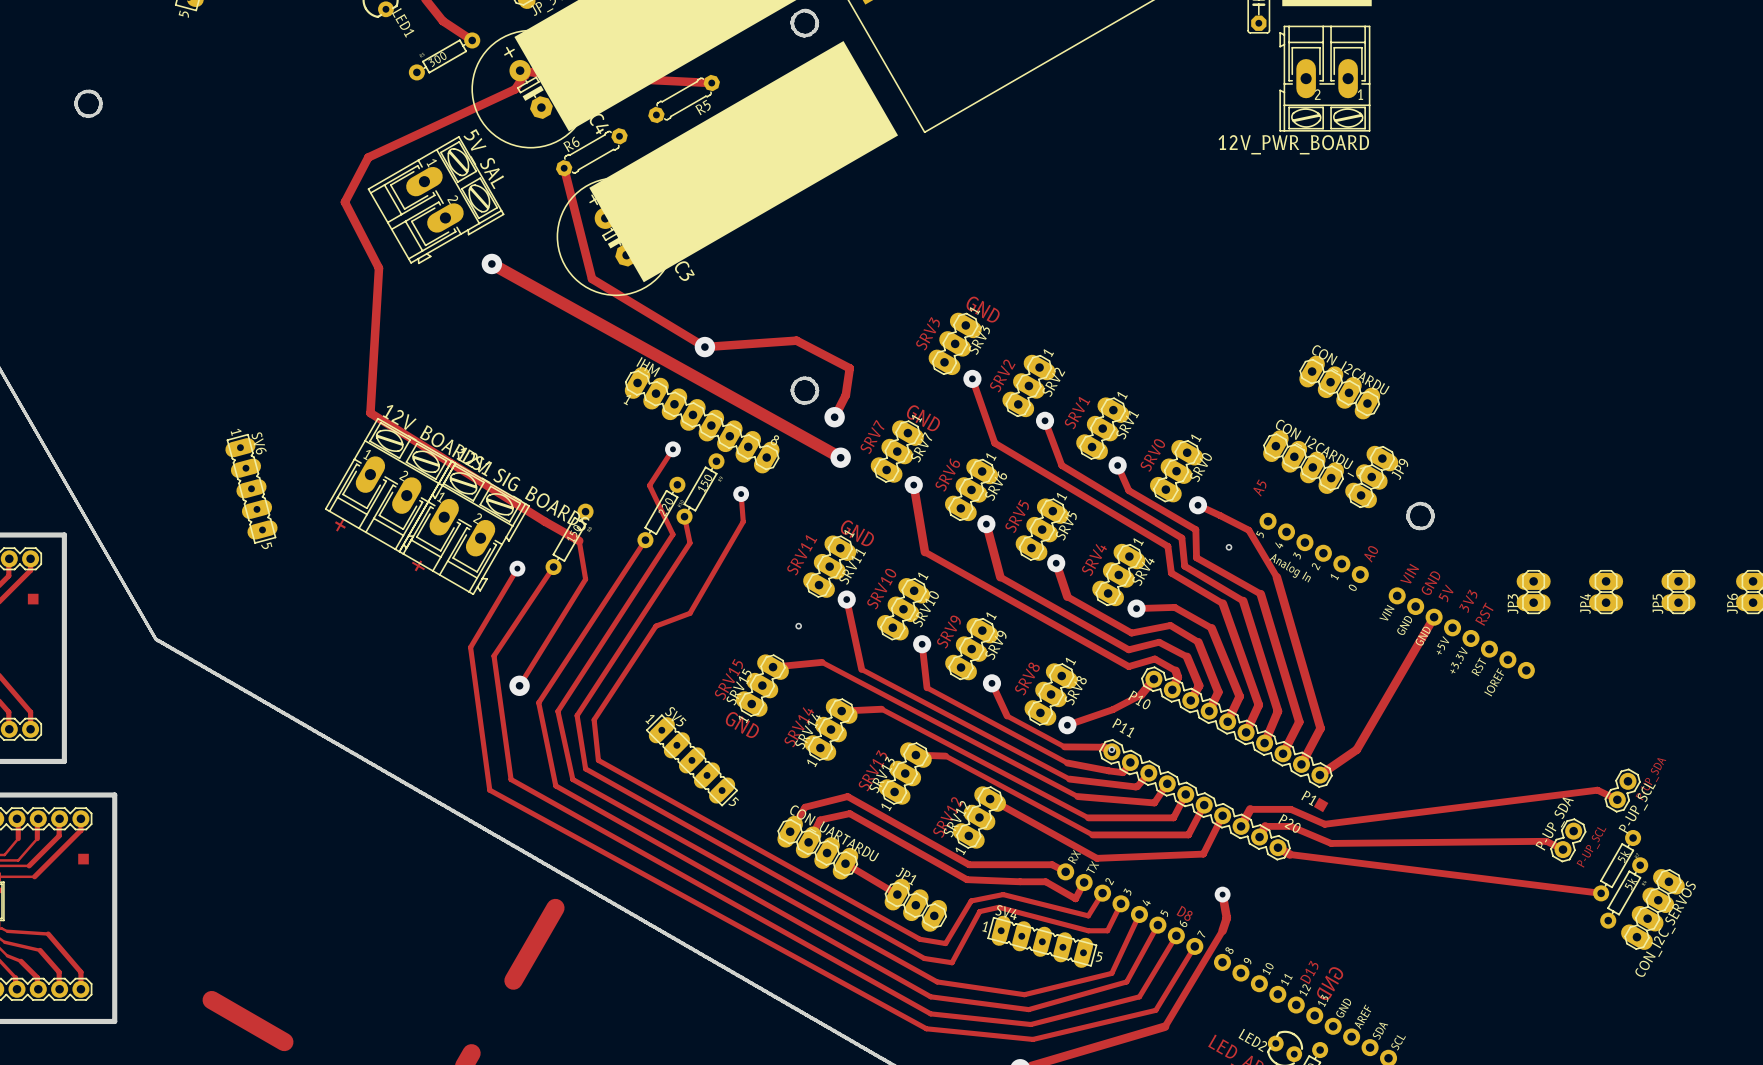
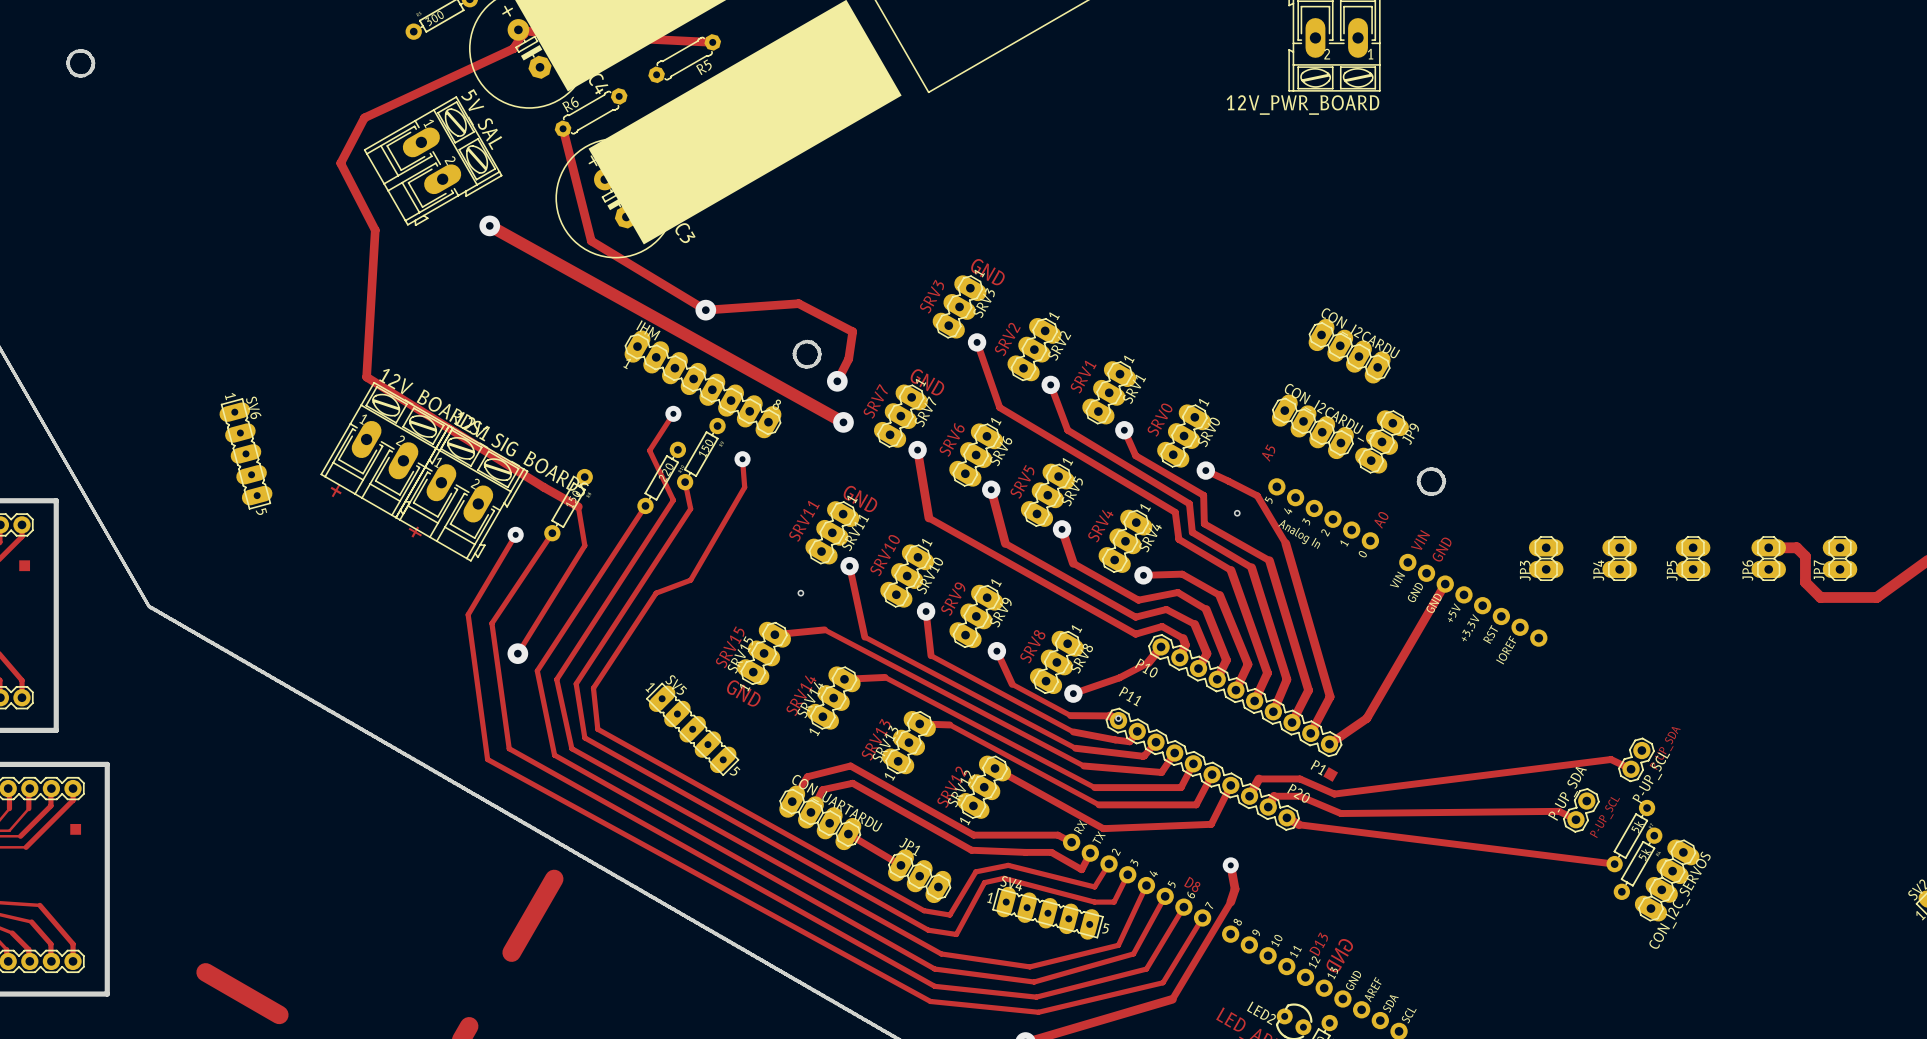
text: 5V (1445, 593) -> none
text: 3V3 (1468, 601) -> none
text: RST (1484, 614) -> none

